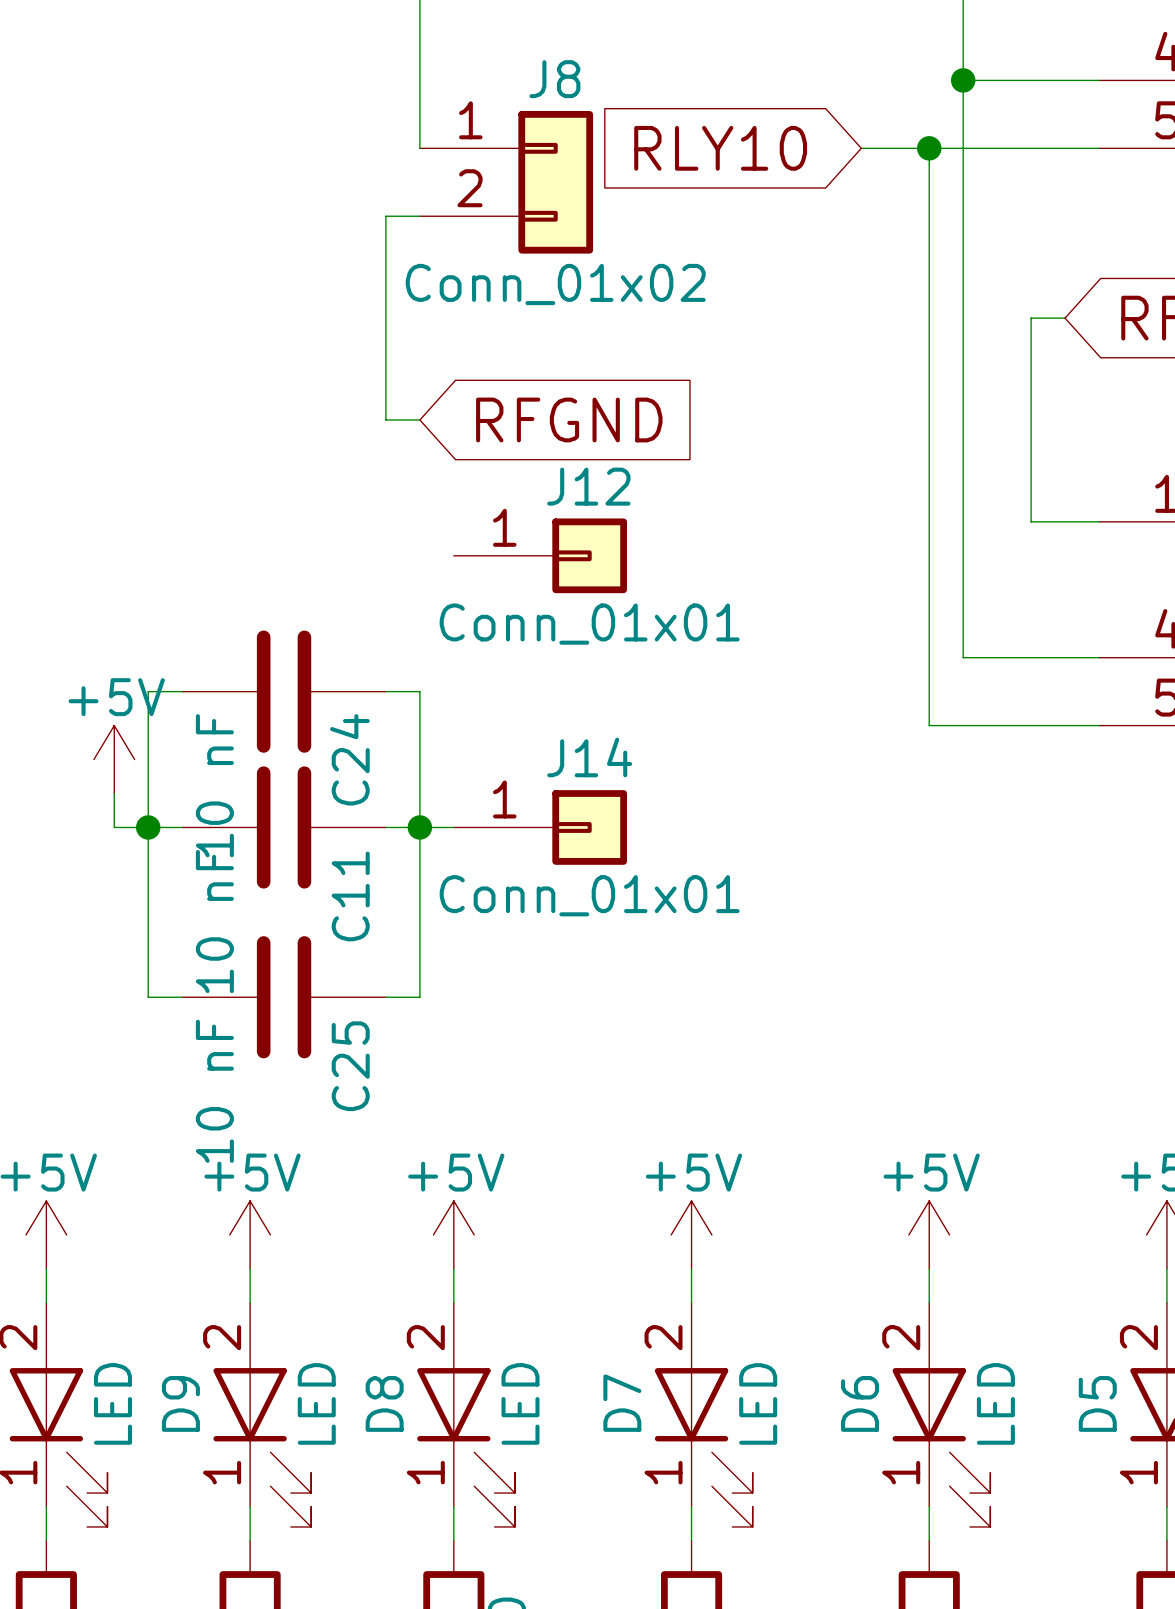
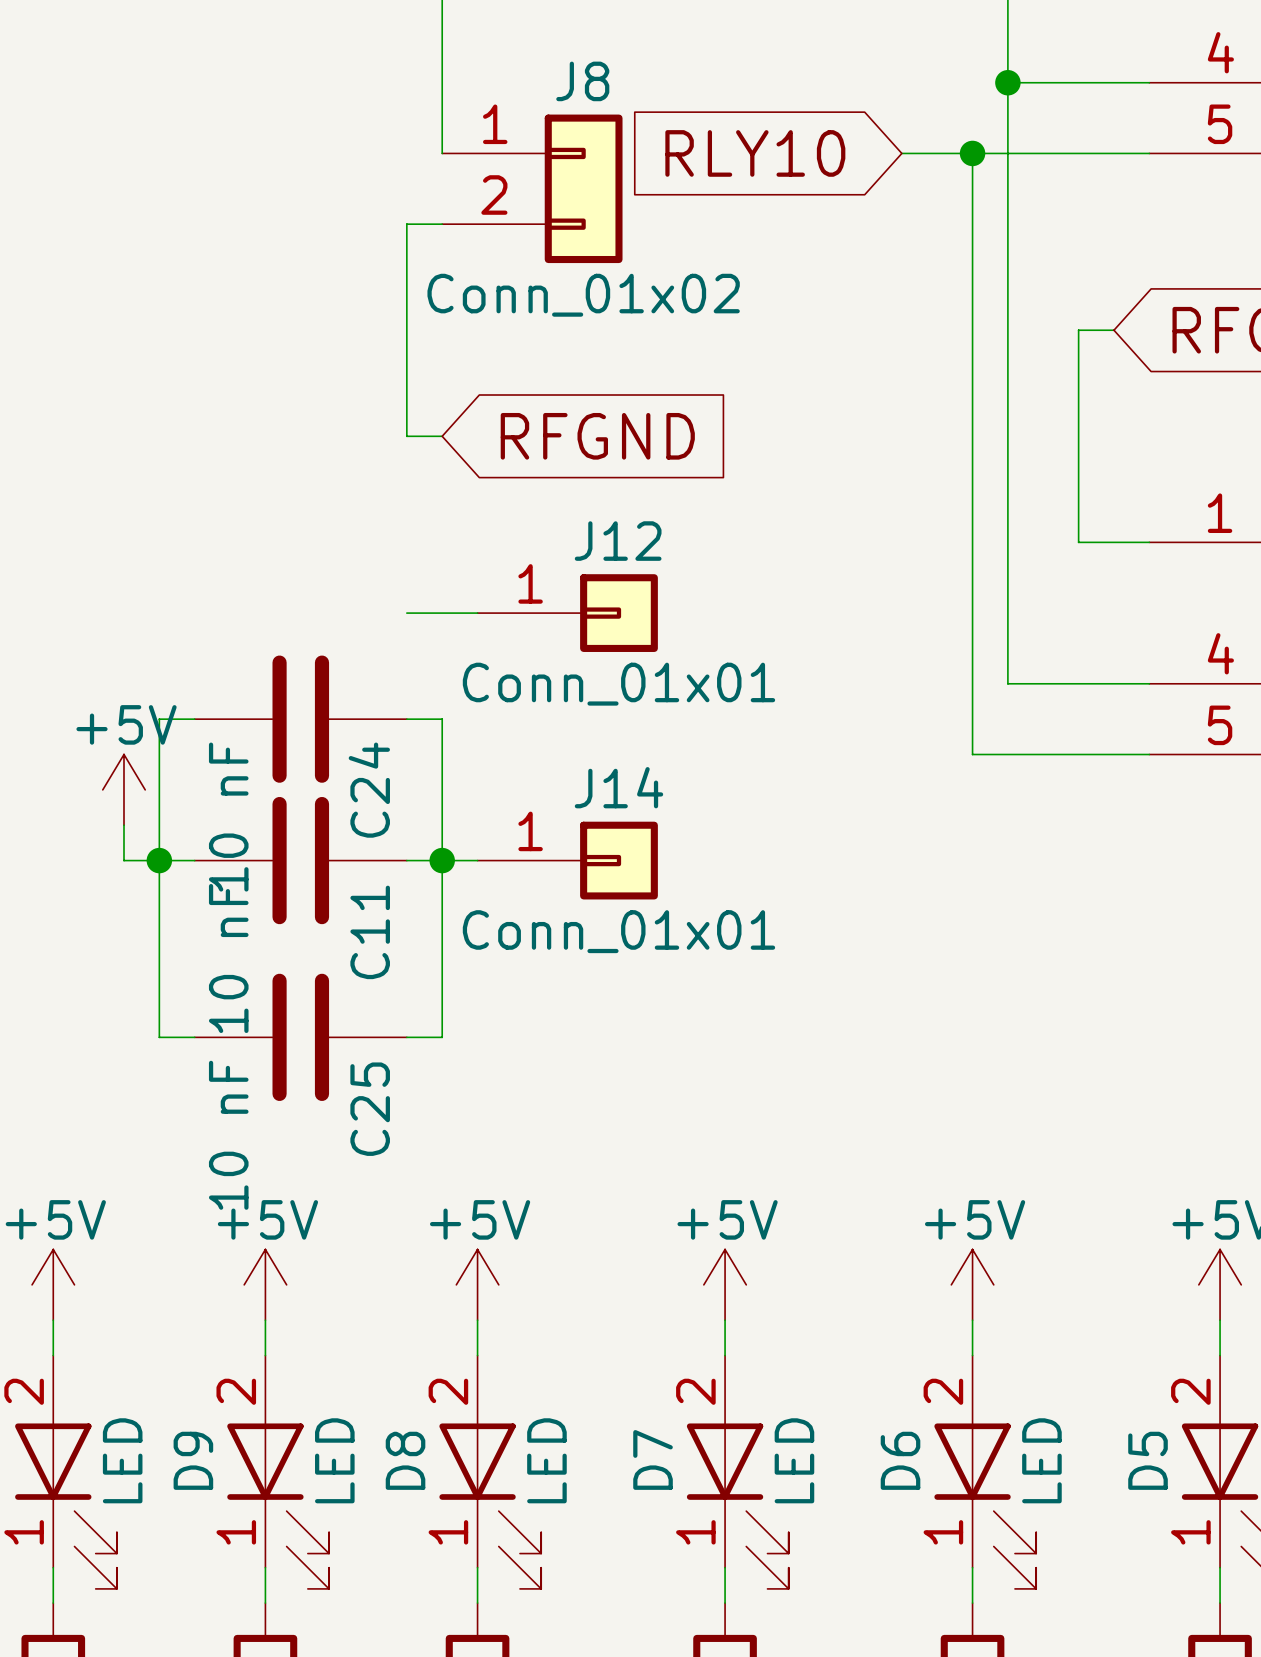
J12 position: (540, 555) -> (567, 613)
wire: none -> (406, 613) (477, 613)

